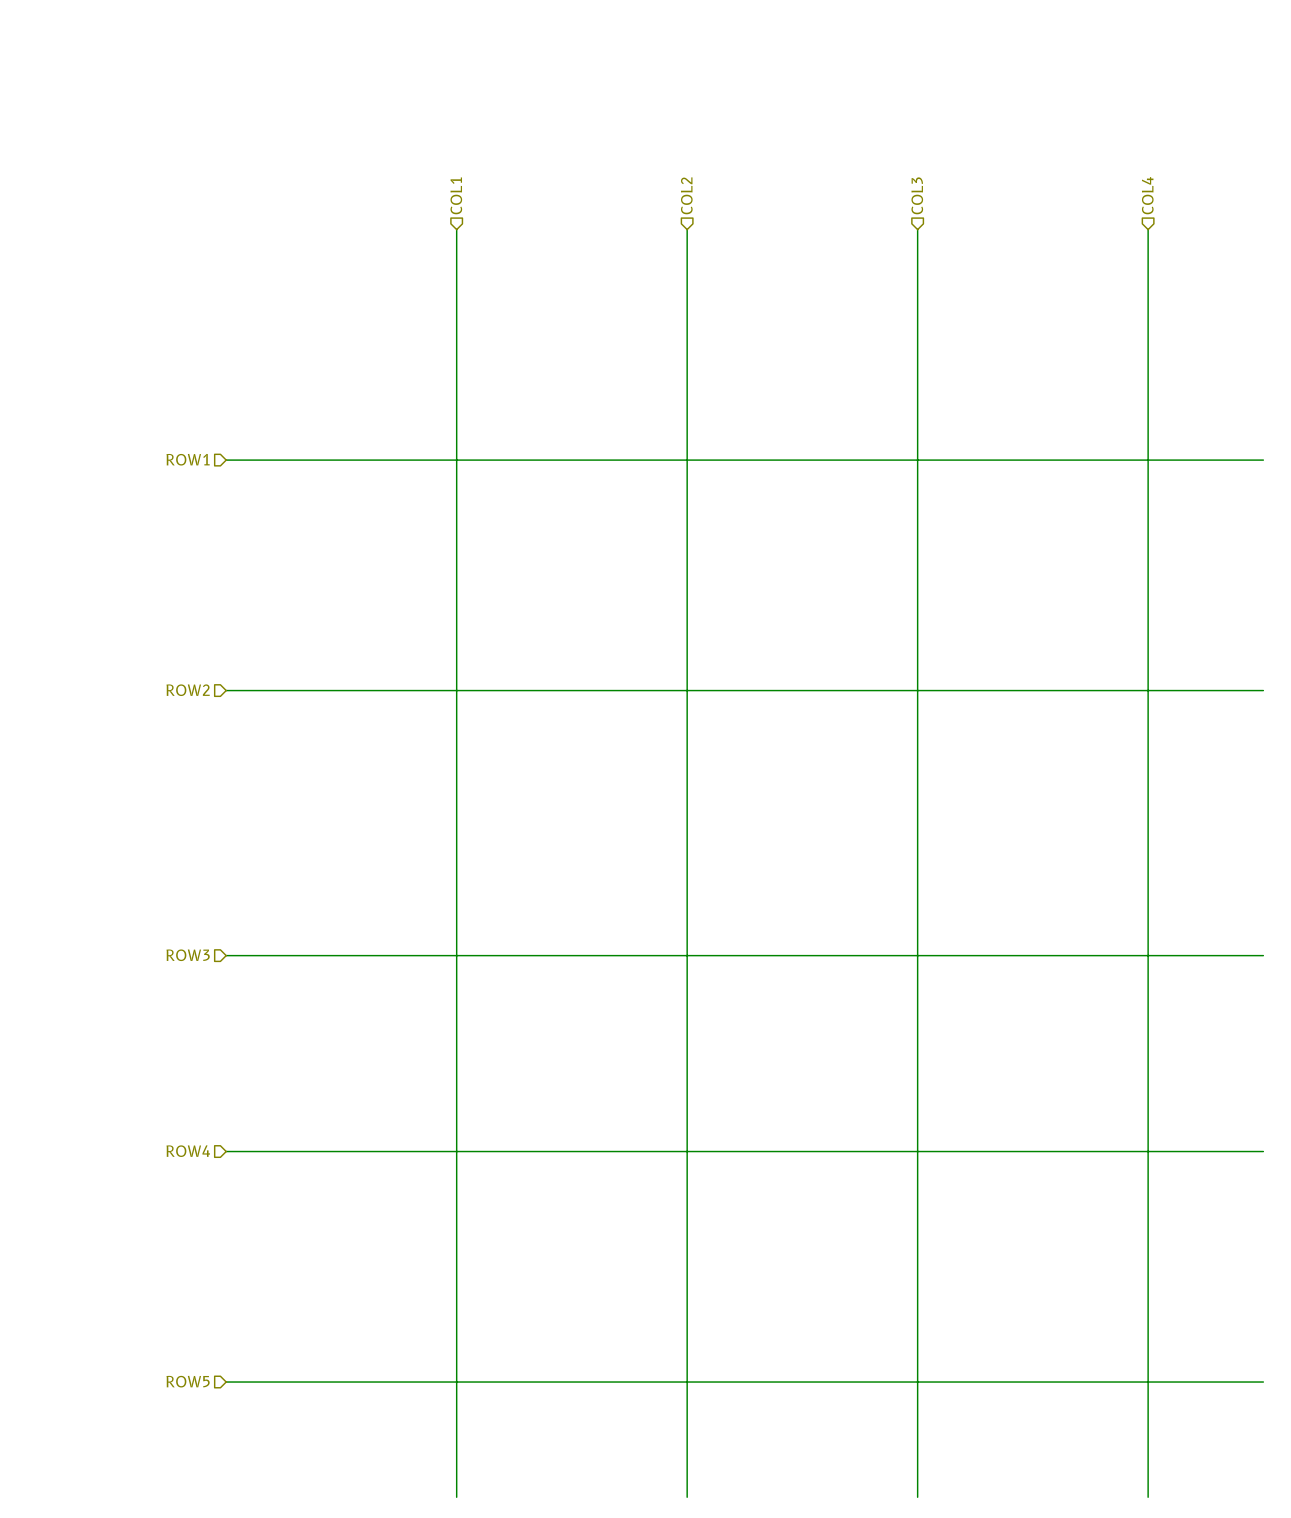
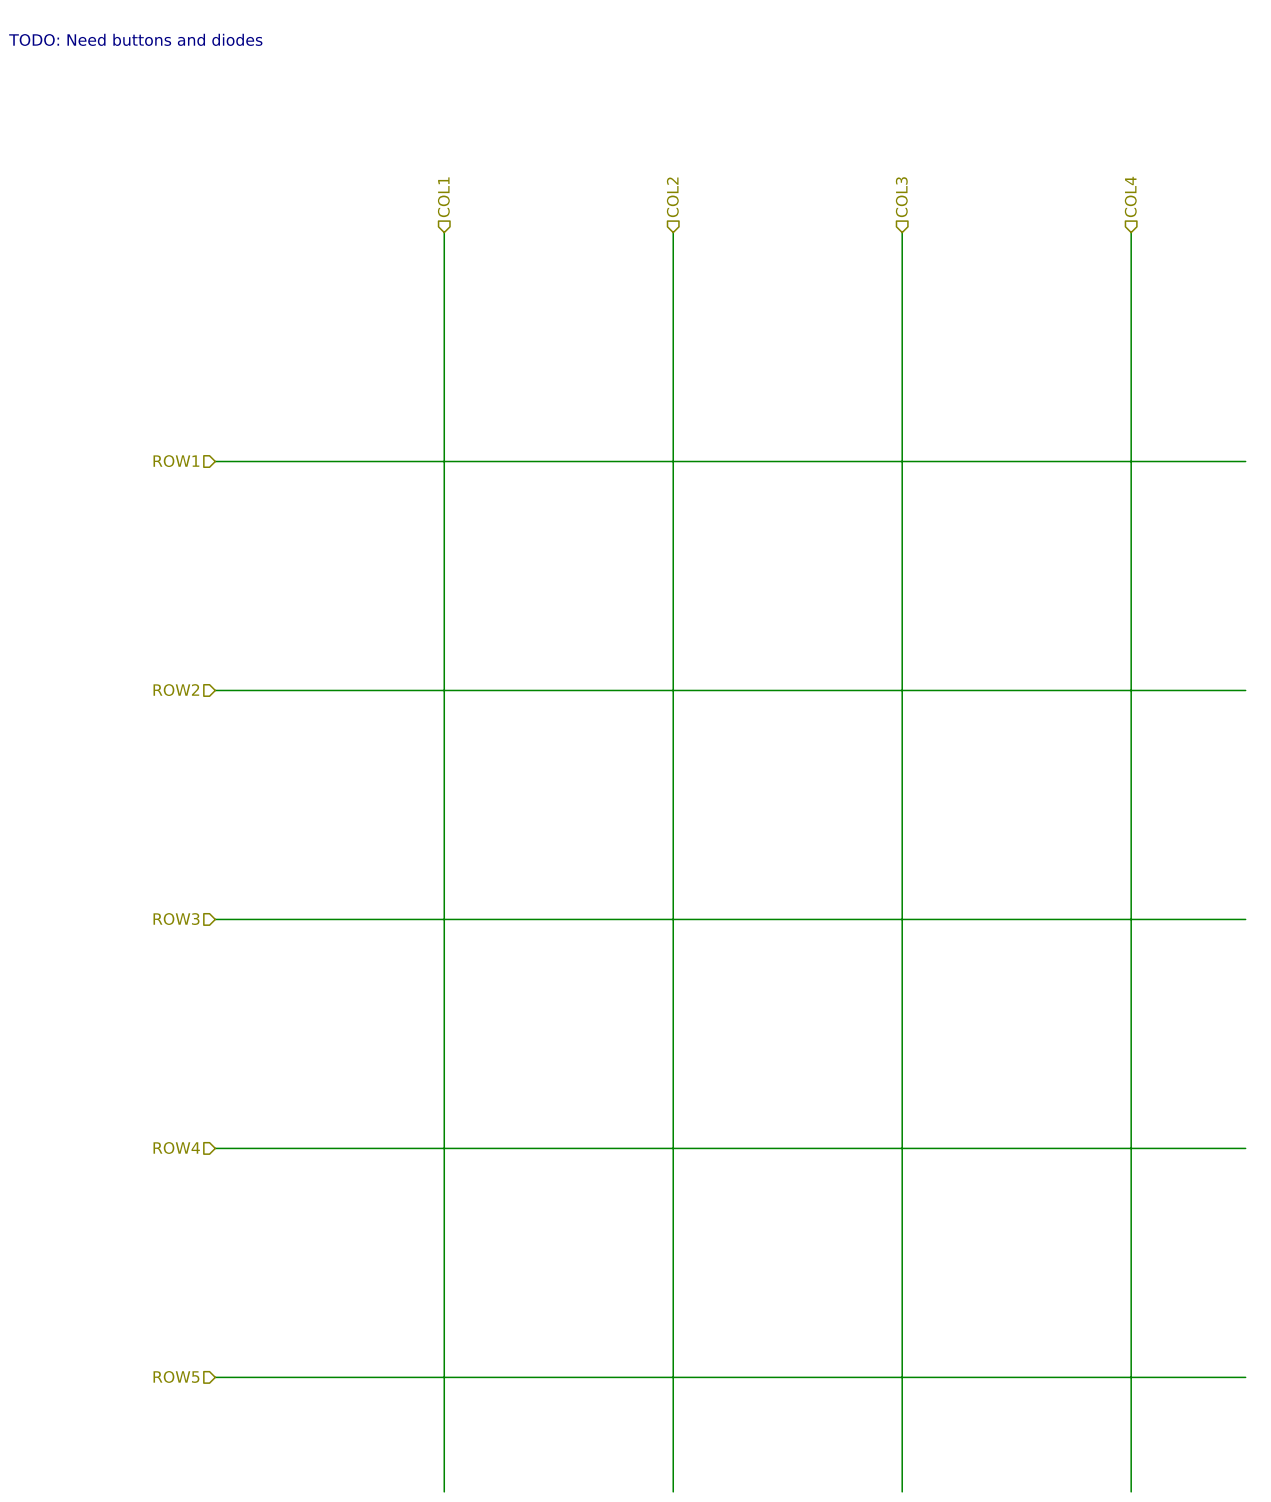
text: none -> TODO: Need buttons and diodes (135, 39)
hierarchical label position: ROW3 (188, 955) -> ROW3 (176, 919)
wire: (226, 955) (1263, 955) -> (215, 919) (1245, 919)

